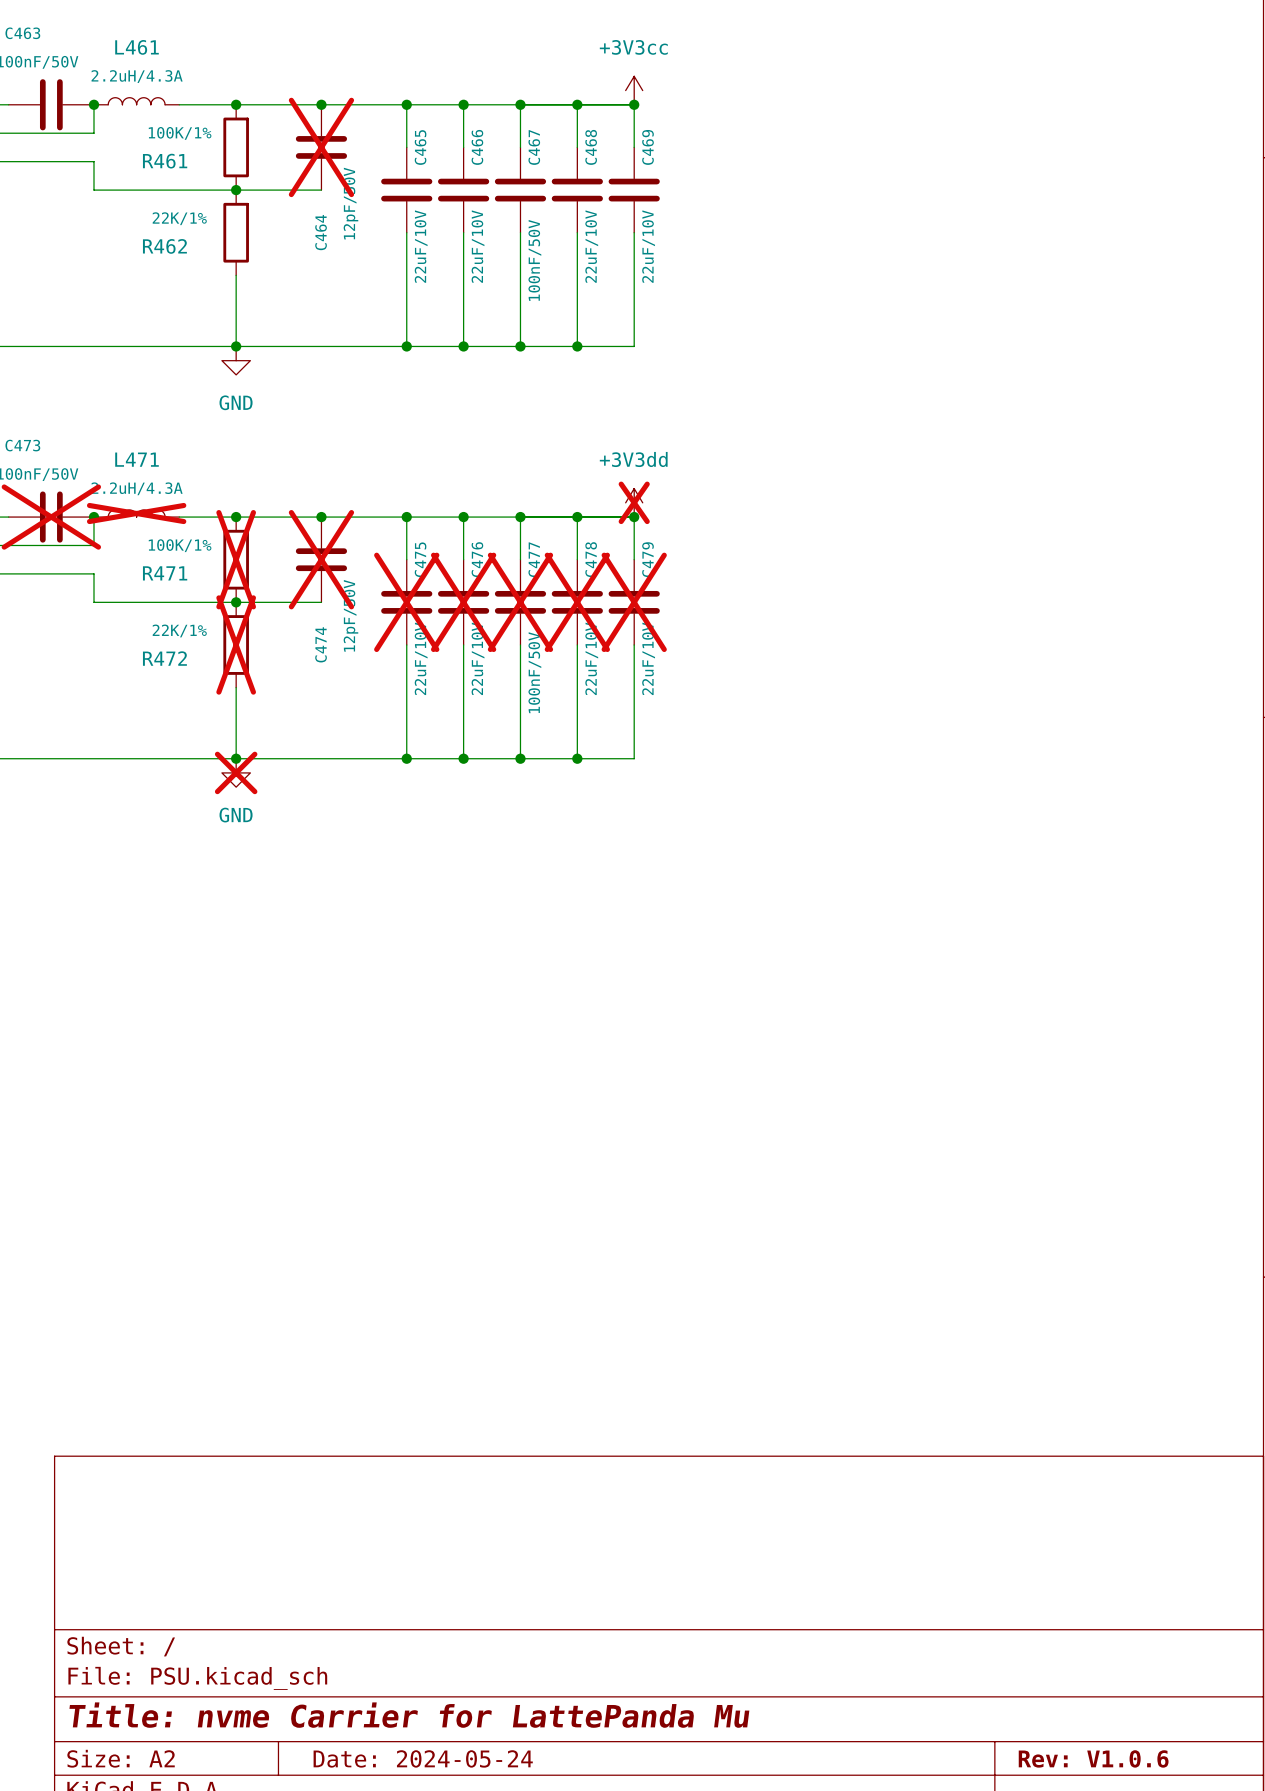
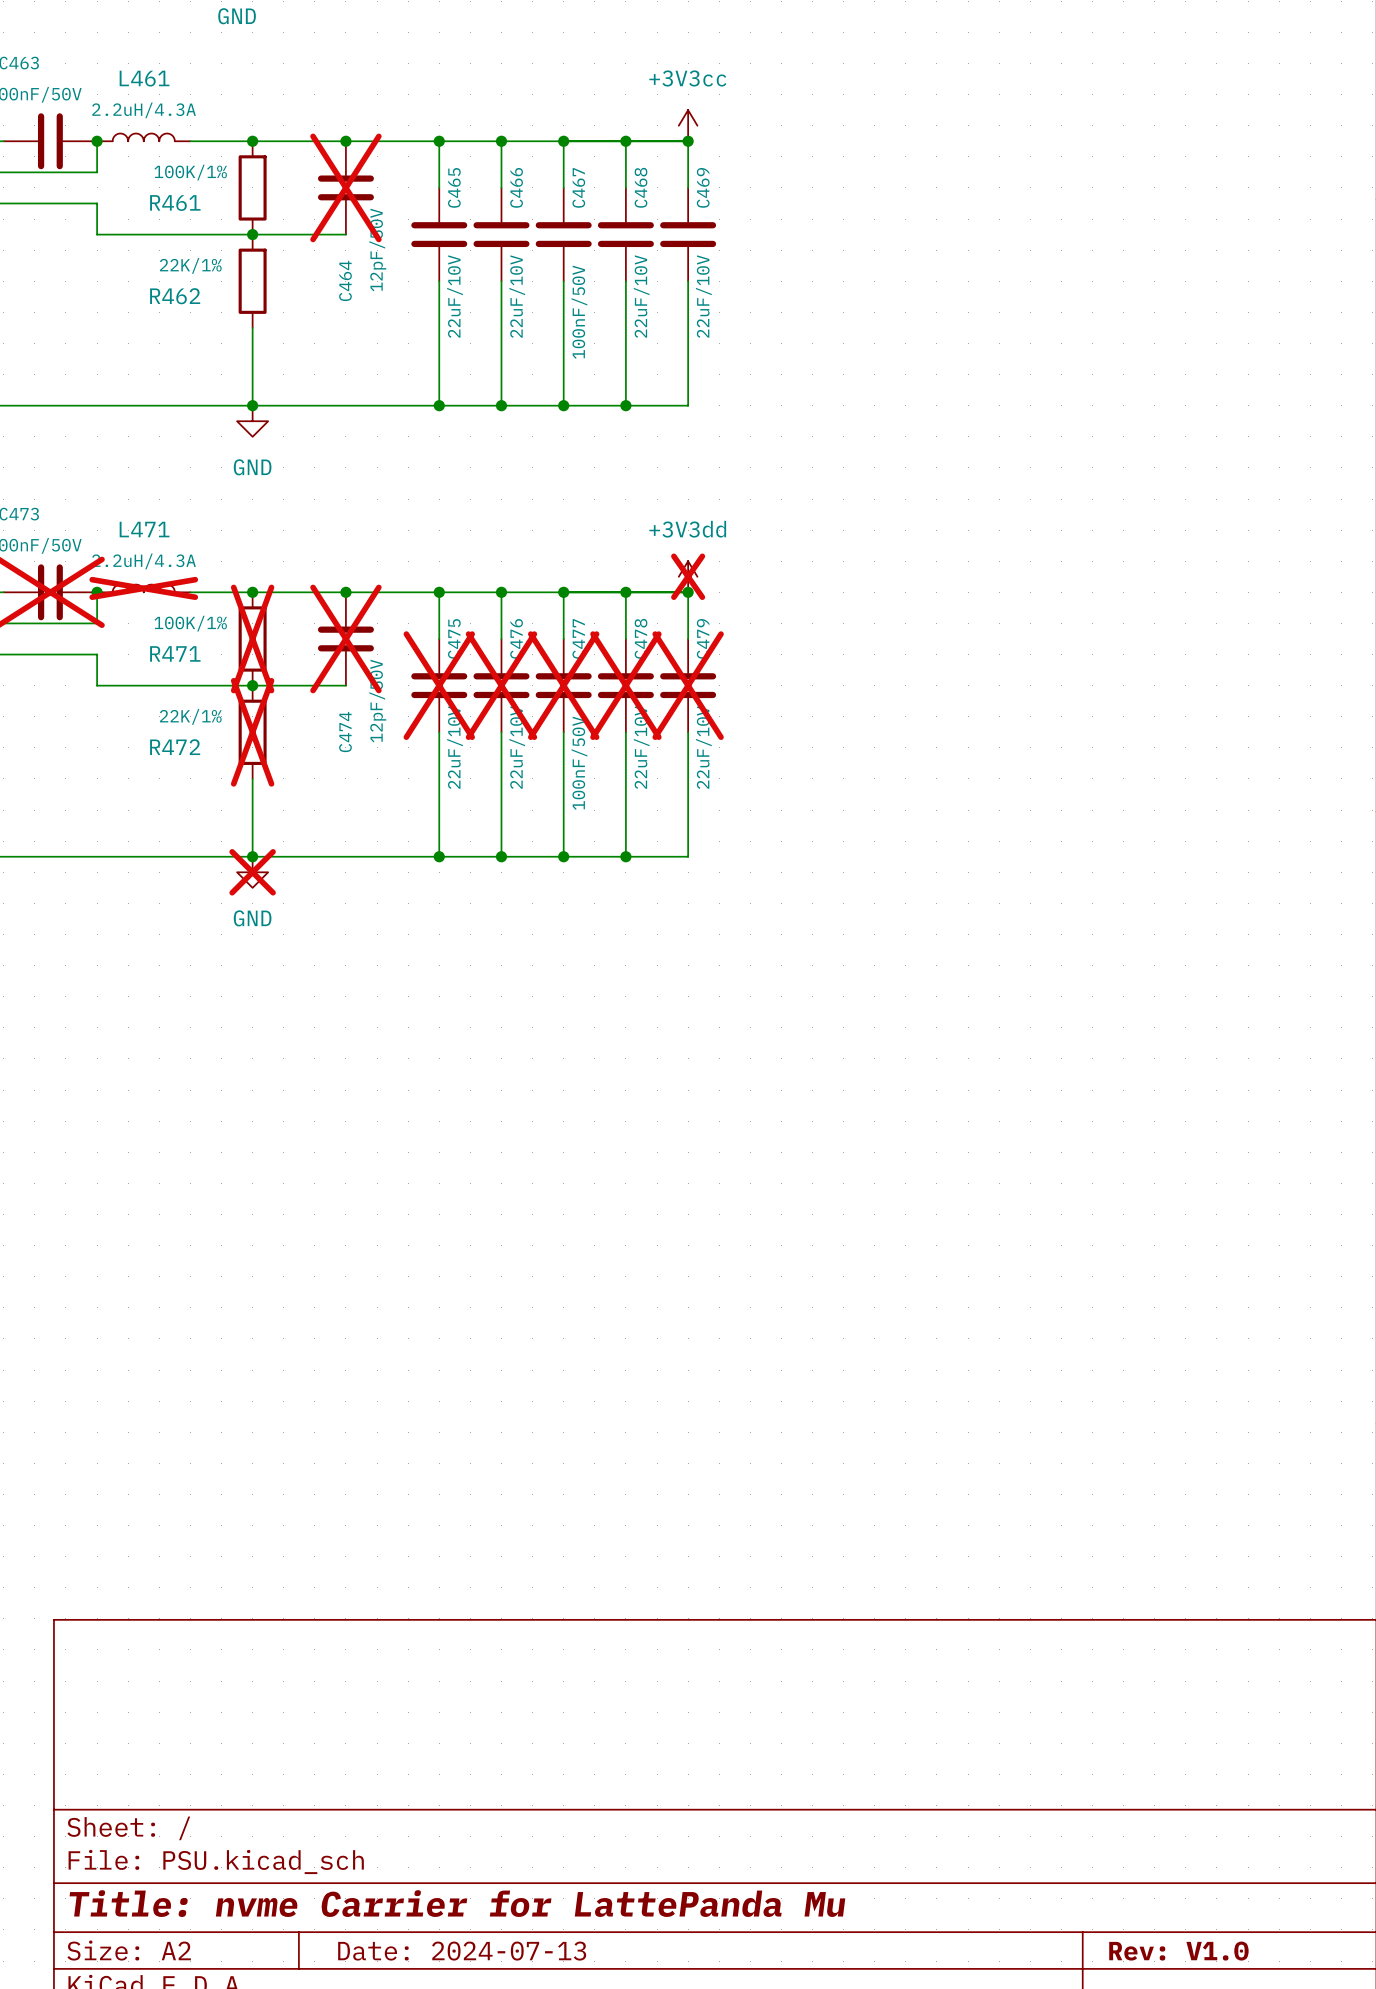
title block: Date: 2024-05-24 (423, 1758) -> Date: 2024-07-13 (462, 1951)
title block: Rev: V1.0.6 (1093, 1758) -> Rev: V1.0 (1178, 1951)

